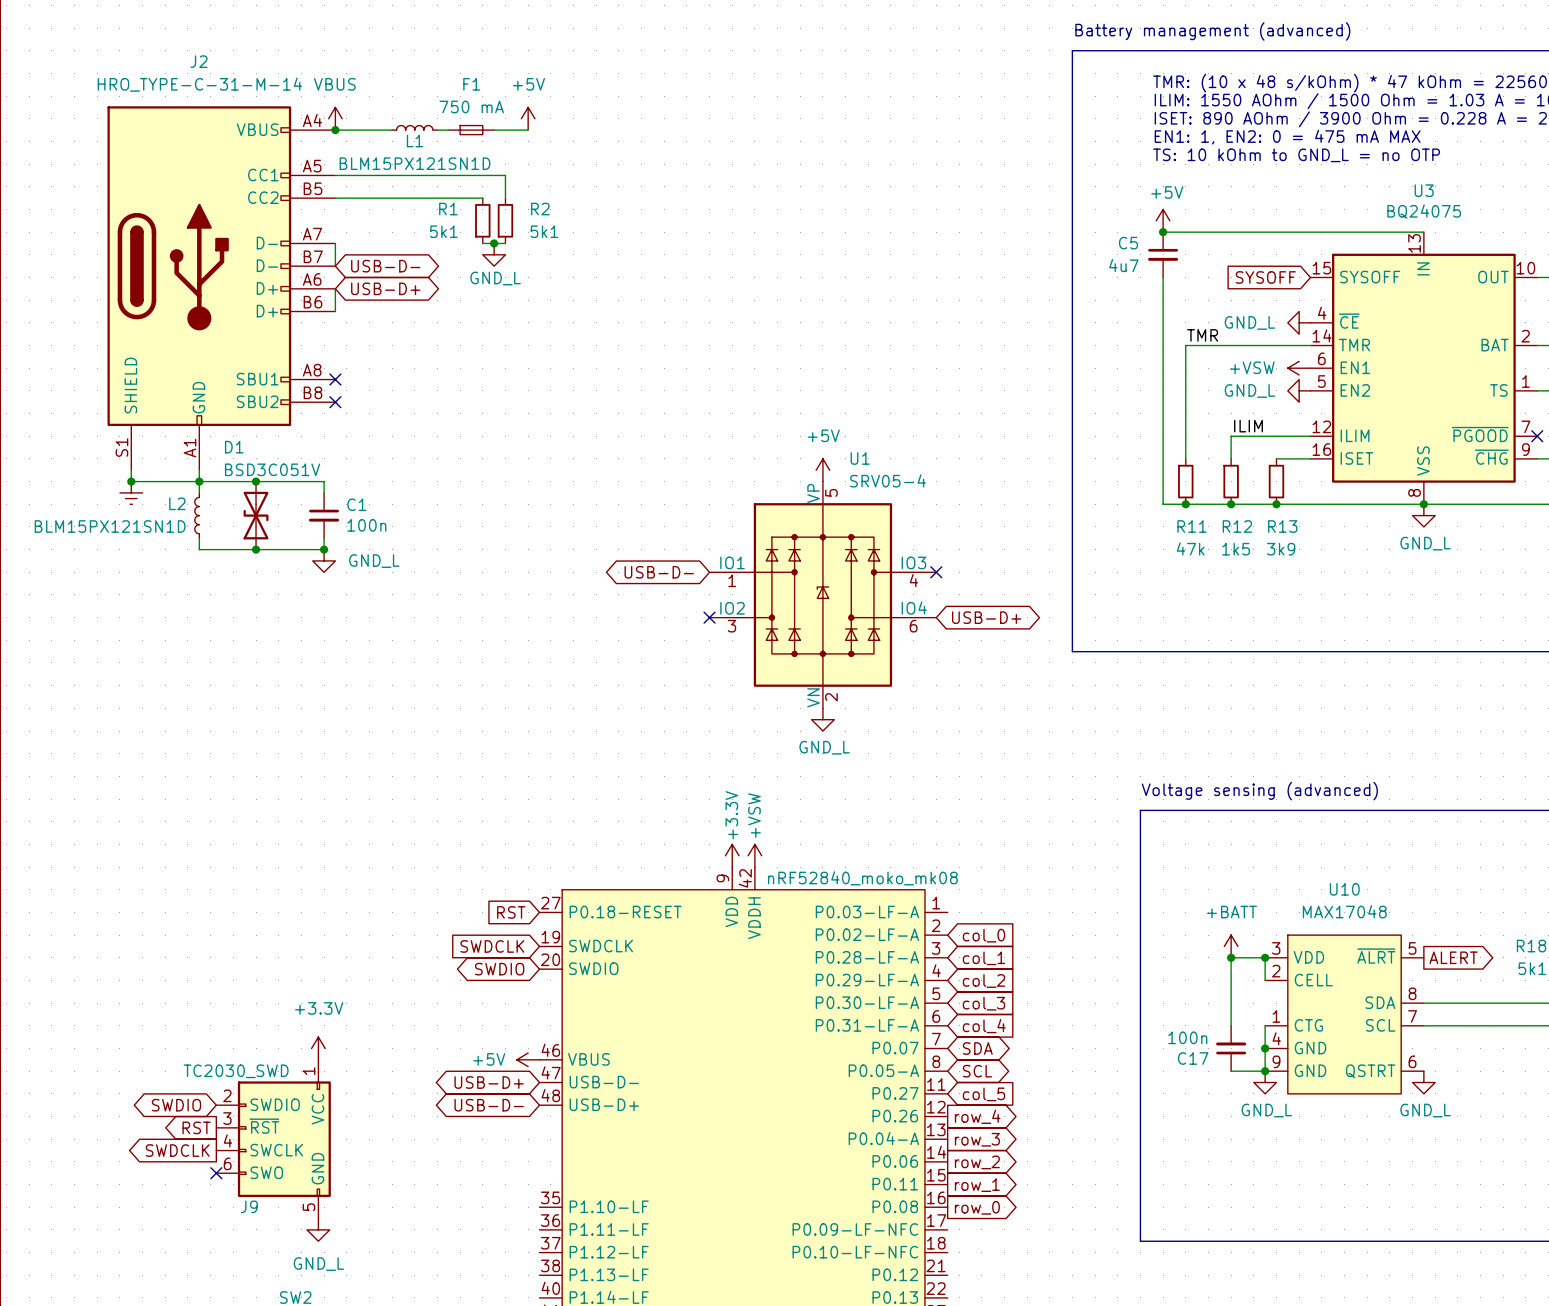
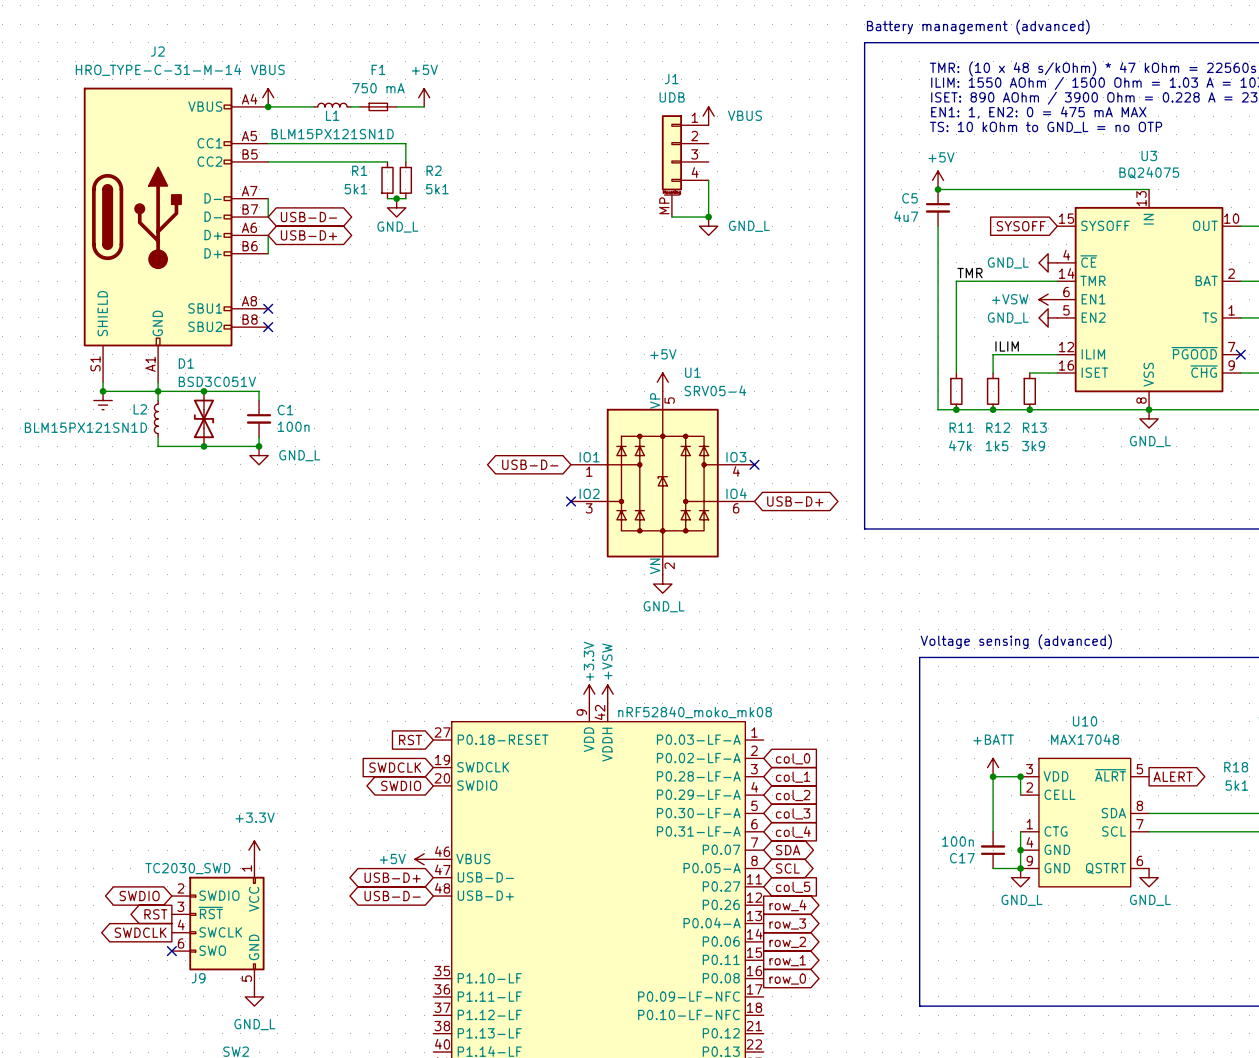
power symbol: none -> VBUS (708, 116)
J1: none -> UDB (685, 166)
wire: none -> (708, 180) (708, 217) (671, 217)
junction: none -> (708, 217)
power symbol: none -> GND_L (708, 226)

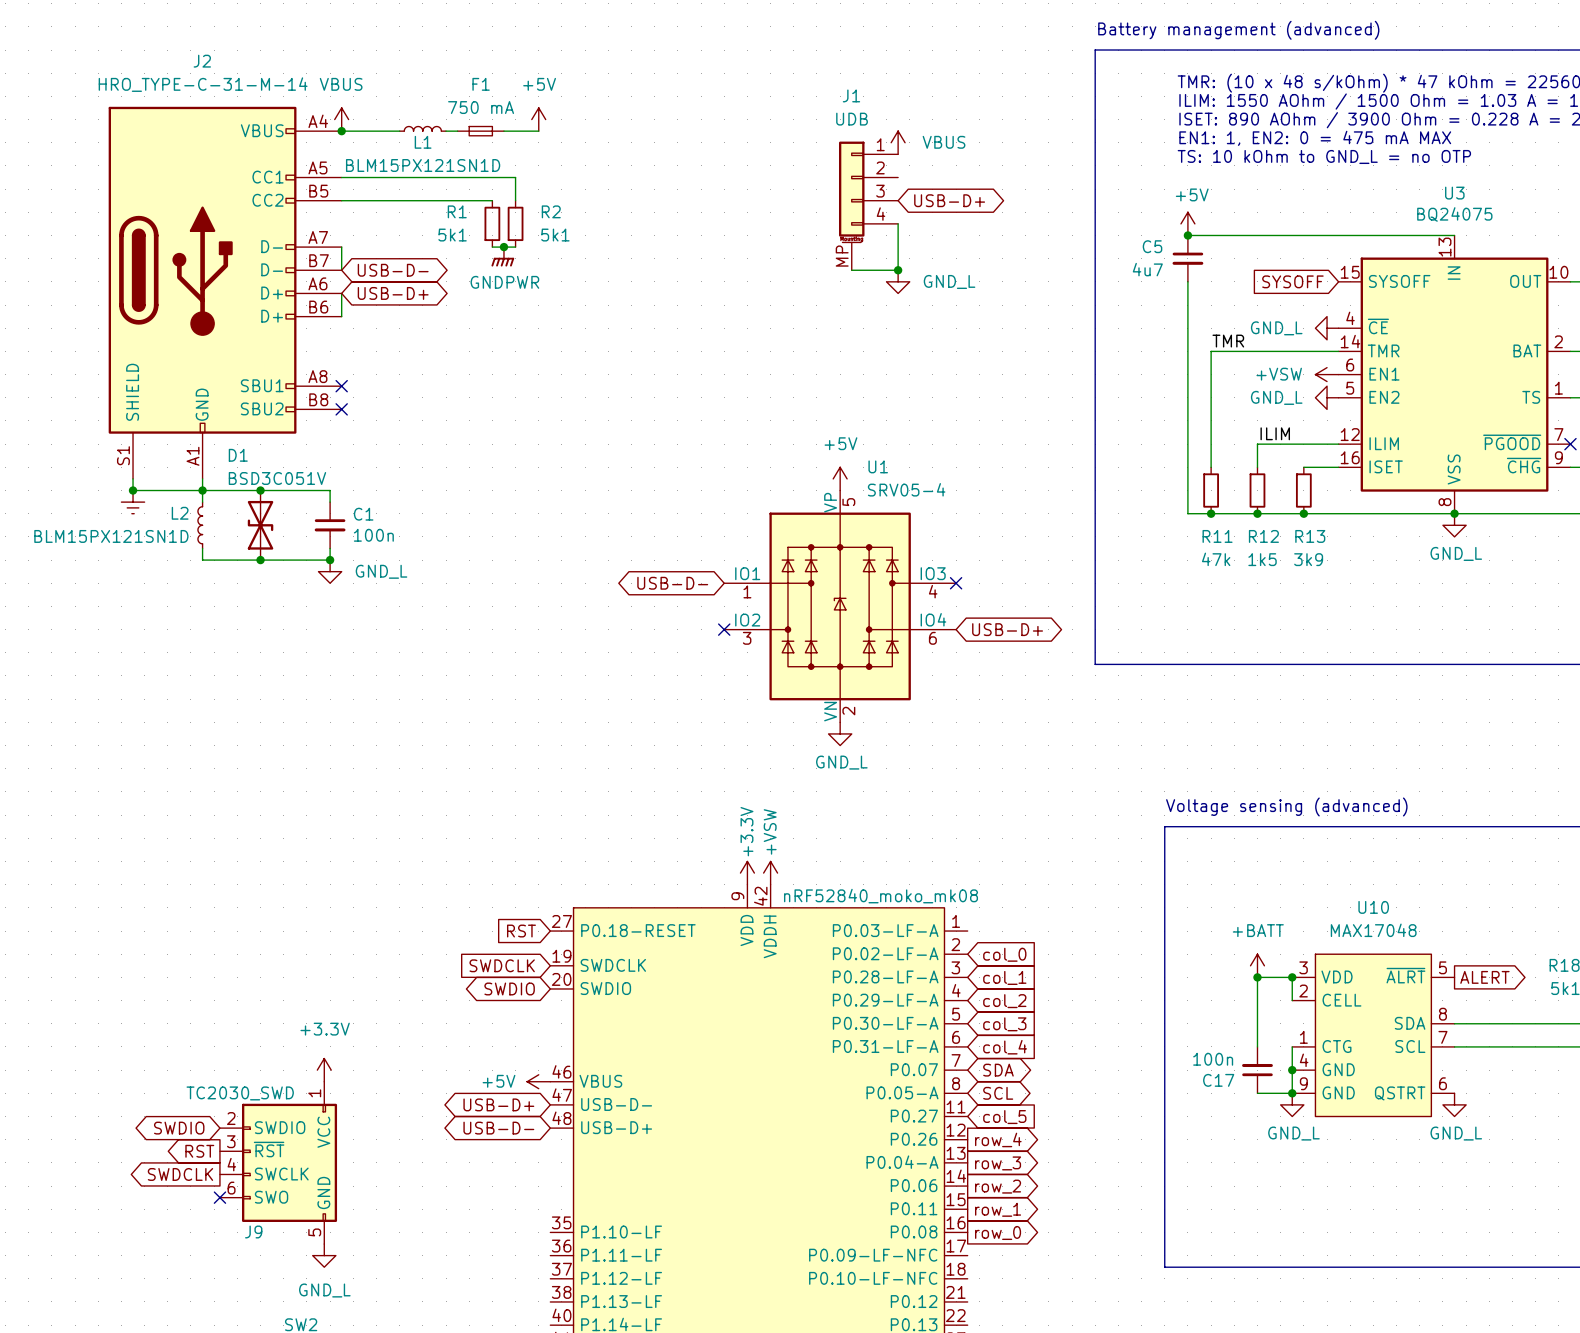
global label: none -> USB-D+ (949, 200)
power symbol: GND_L (396, 207) -> GNDPWR (502, 256)

